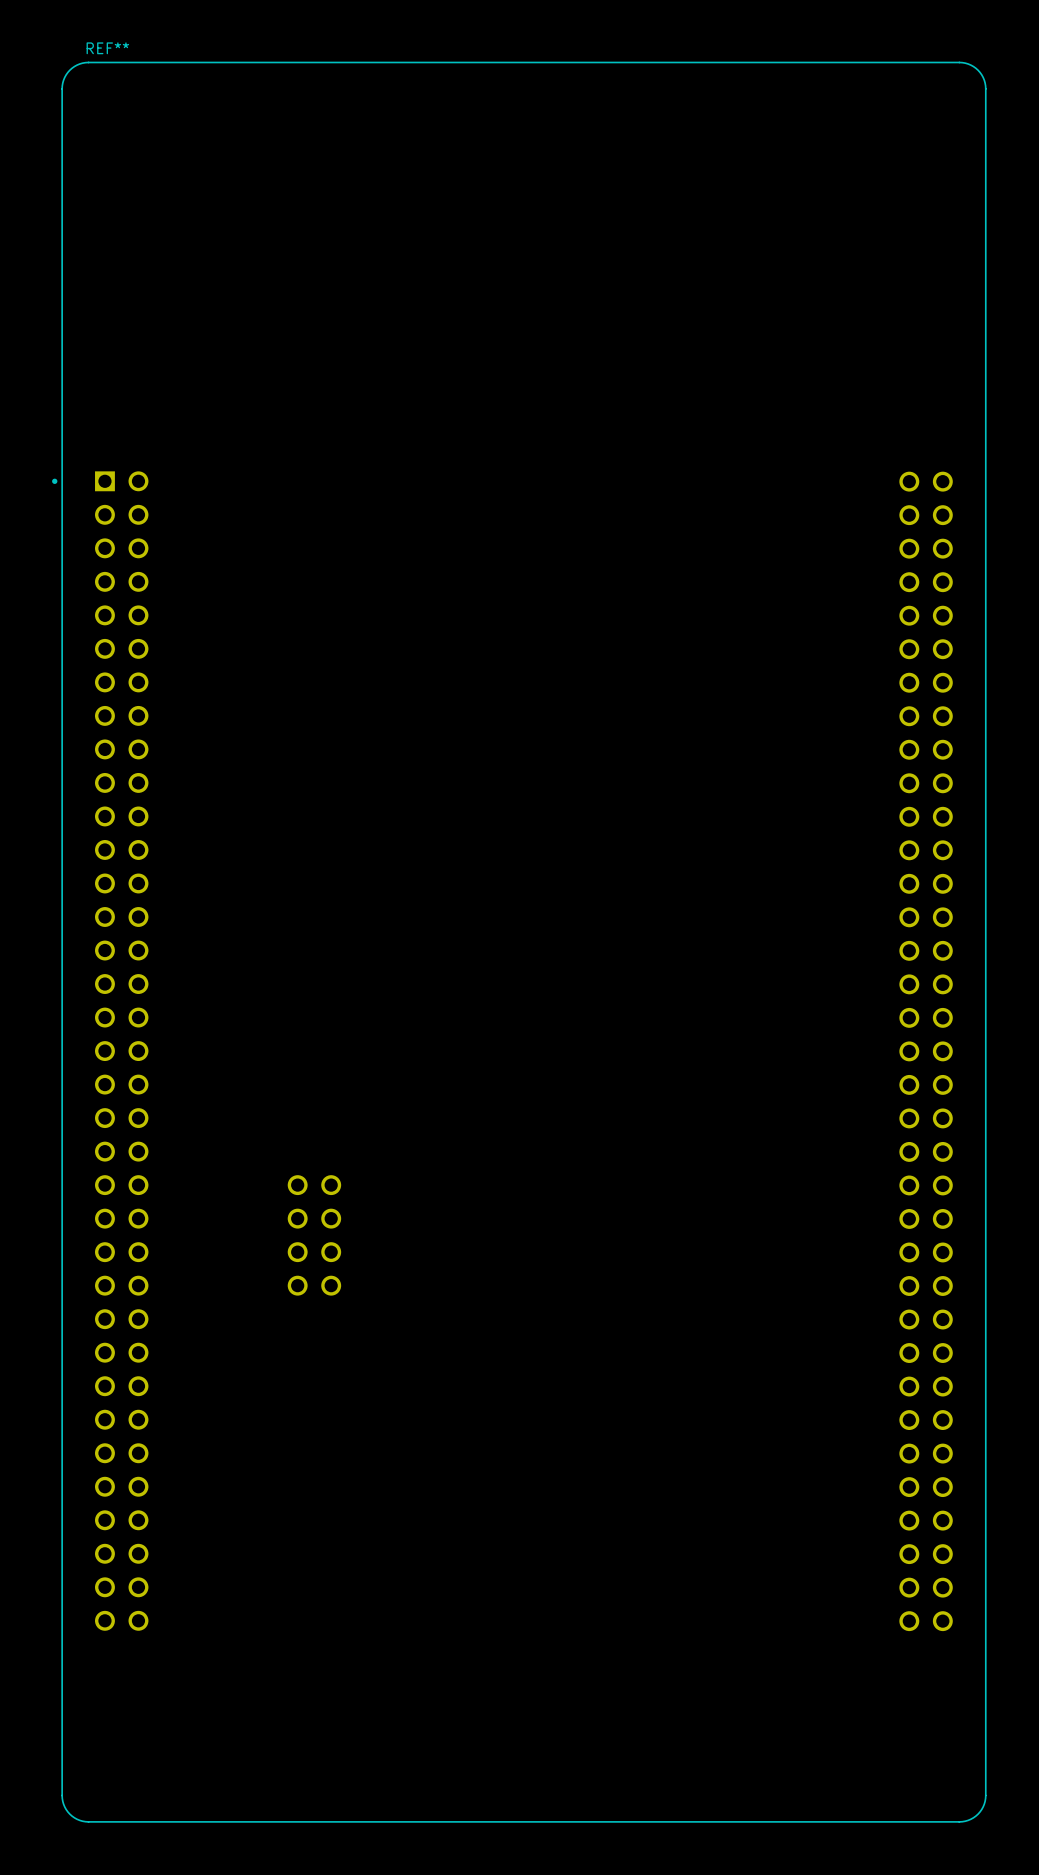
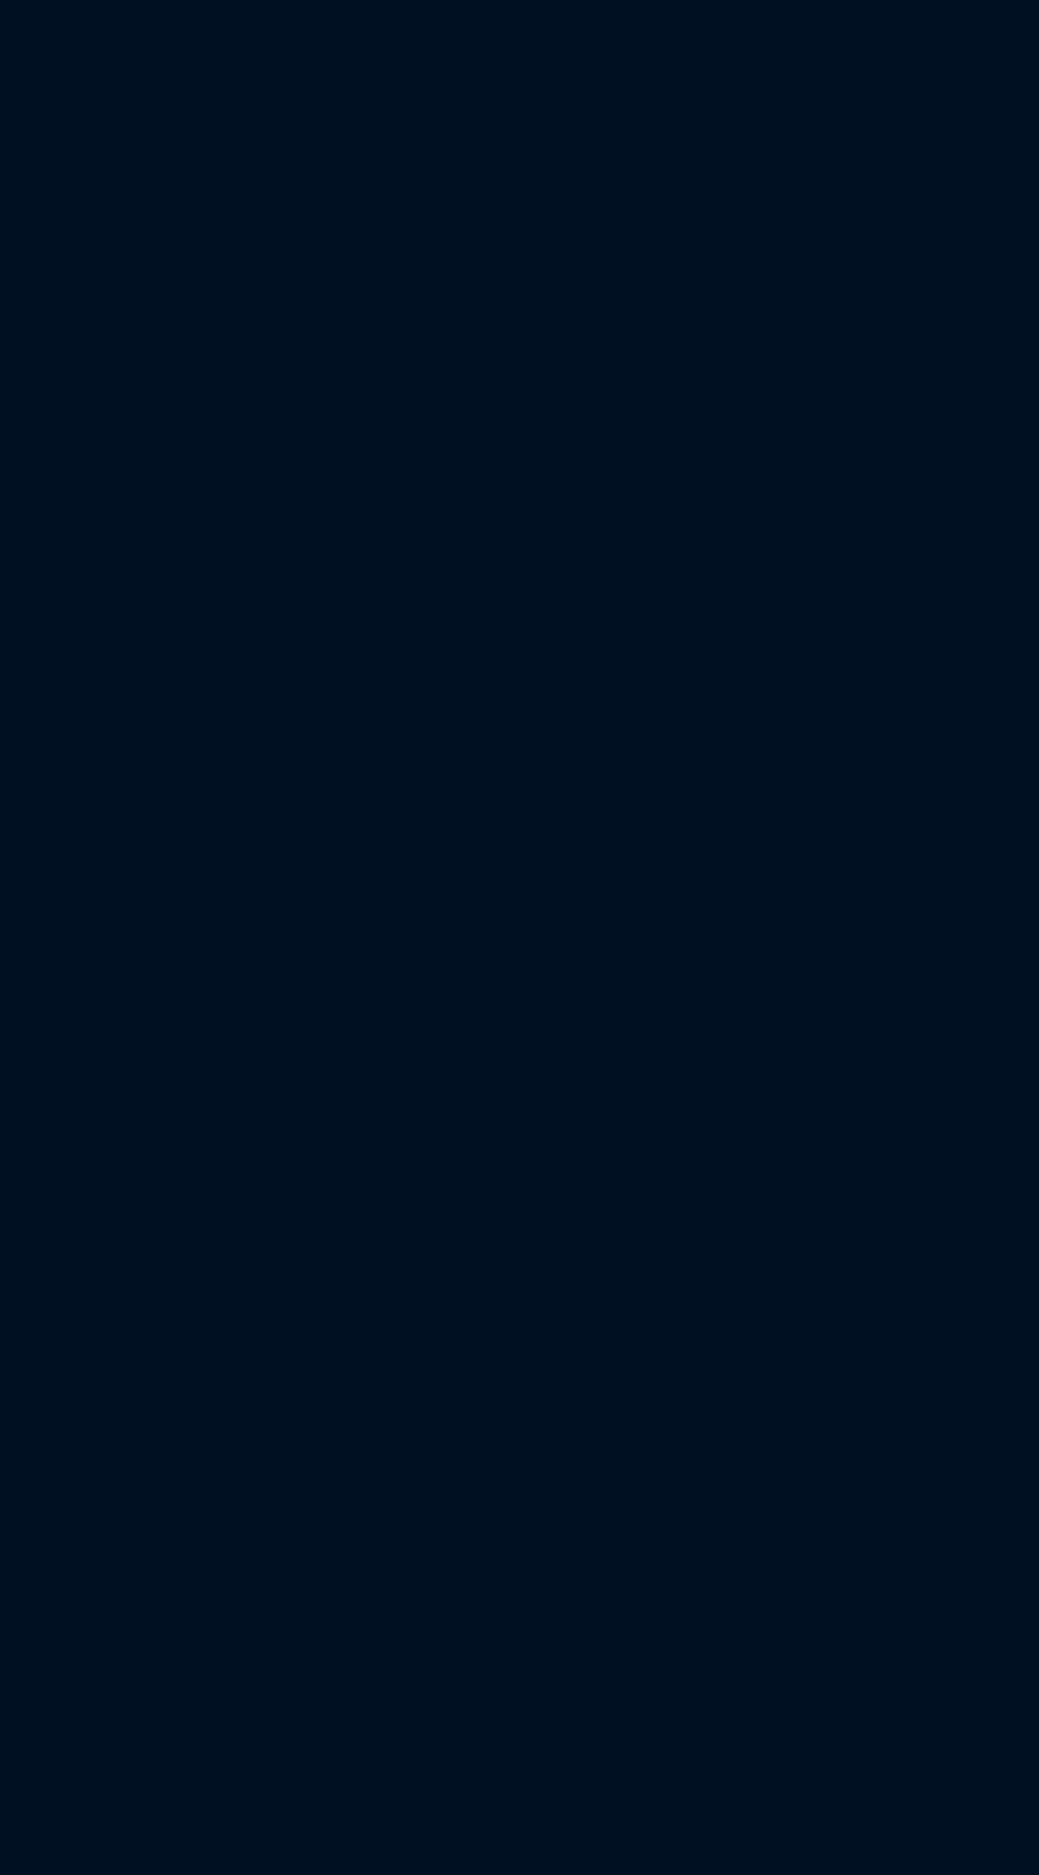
REF**: (519, 942) -> none

